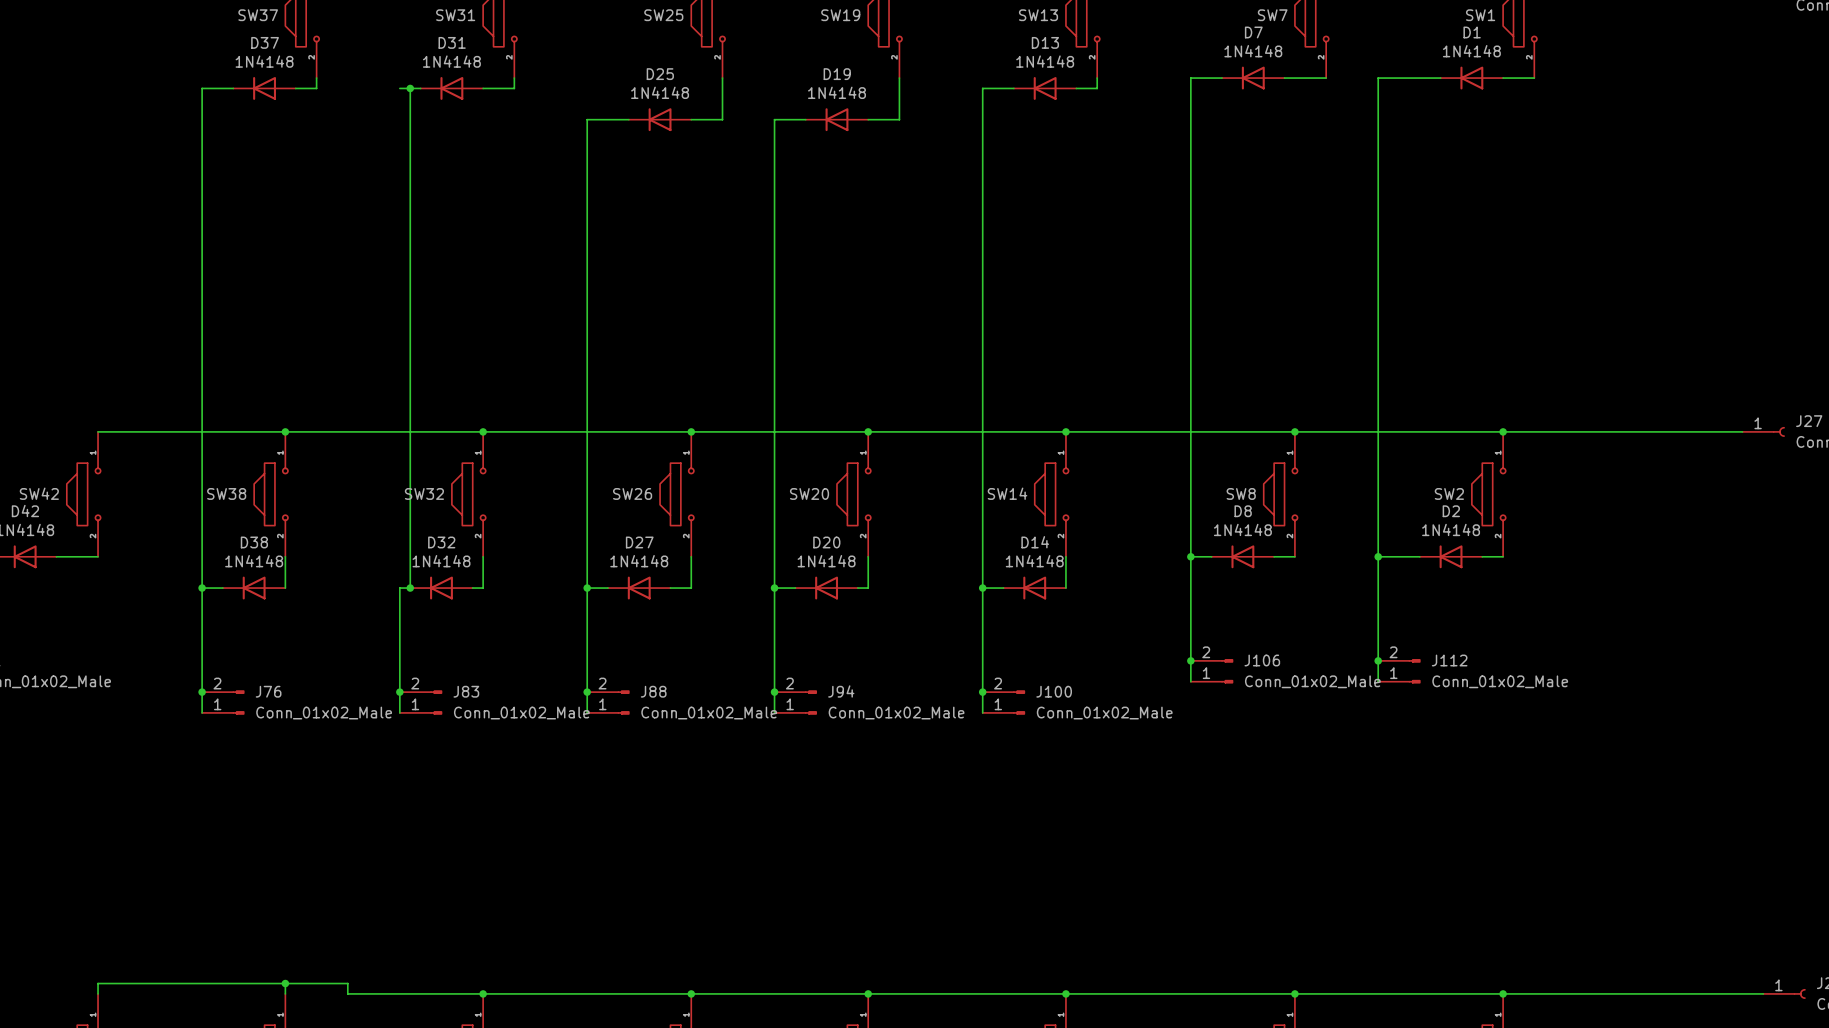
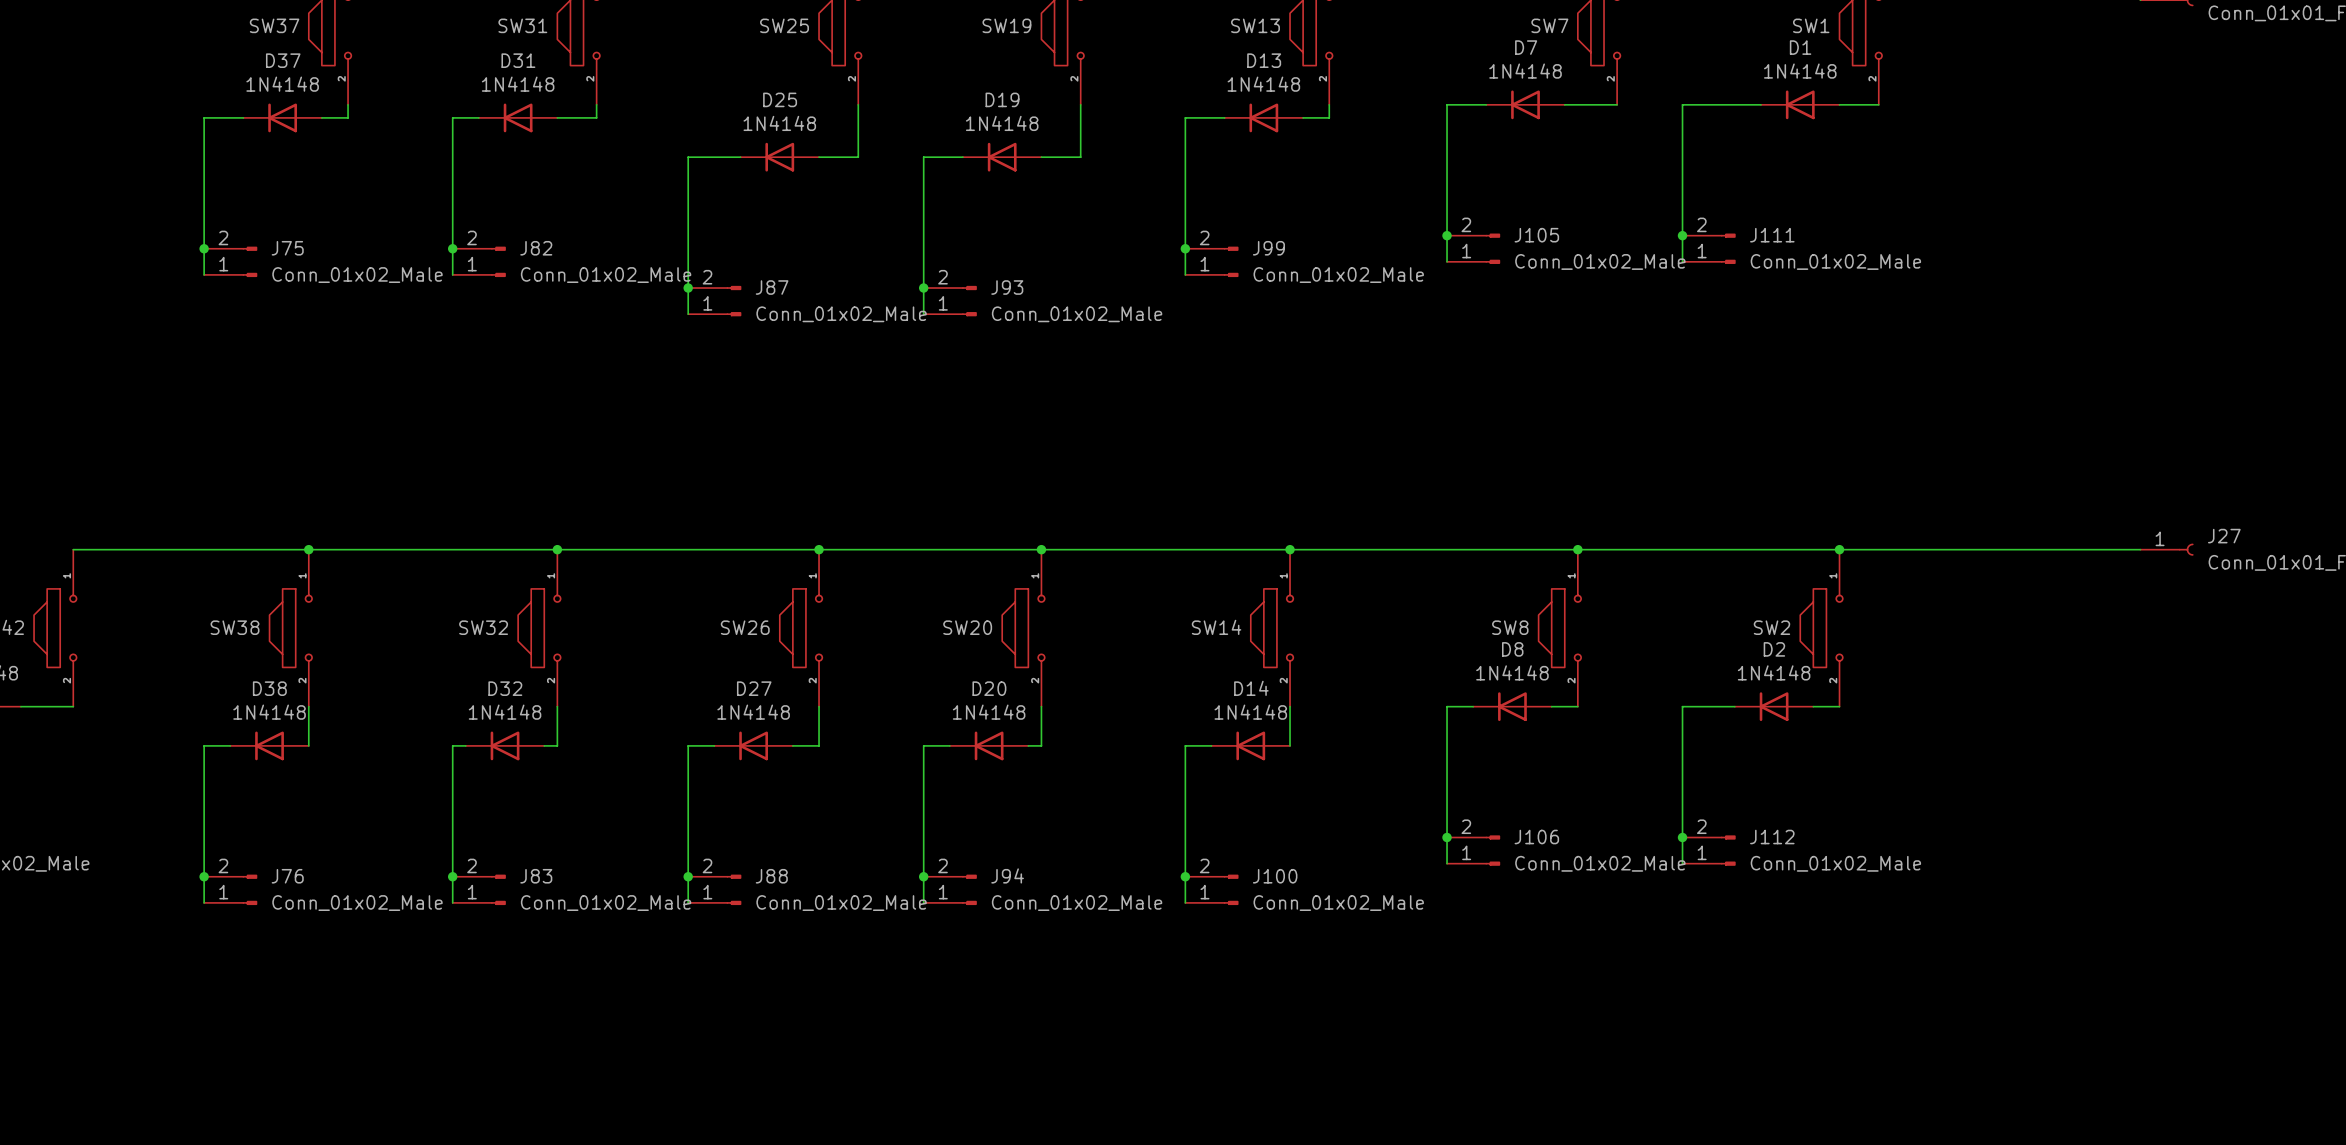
wire: none -> (452, 117) (452, 274)
wire: (410, 88) (410, 588) -> none
junction: (410, 88) -> none
junction: none -> (1447, 235)
junction: none -> (1682, 235)
junction: none -> (204, 248)
junction: none -> (452, 248)
junction: none -> (1185, 248)
J105: none -> Conn_01x02_Male (1473, 248)
J111: none -> Conn_01x02_Male (1709, 248)
J75: none -> Conn_01x02_Male (230, 261)
J82: none -> Conn_01x02_Male (479, 261)
J99: none -> Conn_01x02_Male (1211, 261)
wire: (1190, 202) (1190, 556) -> none
wire: (1378, 202) (1378, 556) -> none
wire: (202, 213) (202, 588) -> none
wire: (982, 213) (982, 588) -> none
junction: none -> (688, 288)
junction: none -> (923, 288)
J87: none -> Conn_01x02_Male (714, 301)
J93: none -> Conn_01x02_Male (950, 301)
wire: (587, 244) (587, 588) -> none
wire: (774, 244) (774, 588) -> none
junction: (1190, 556) -> none
junction: (1378, 556) -> none
junction: (202, 588) -> none
junction: (410, 588) -> none
junction: (587, 588) -> none
junction: (774, 588) -> none
junction: (982, 588) -> none

